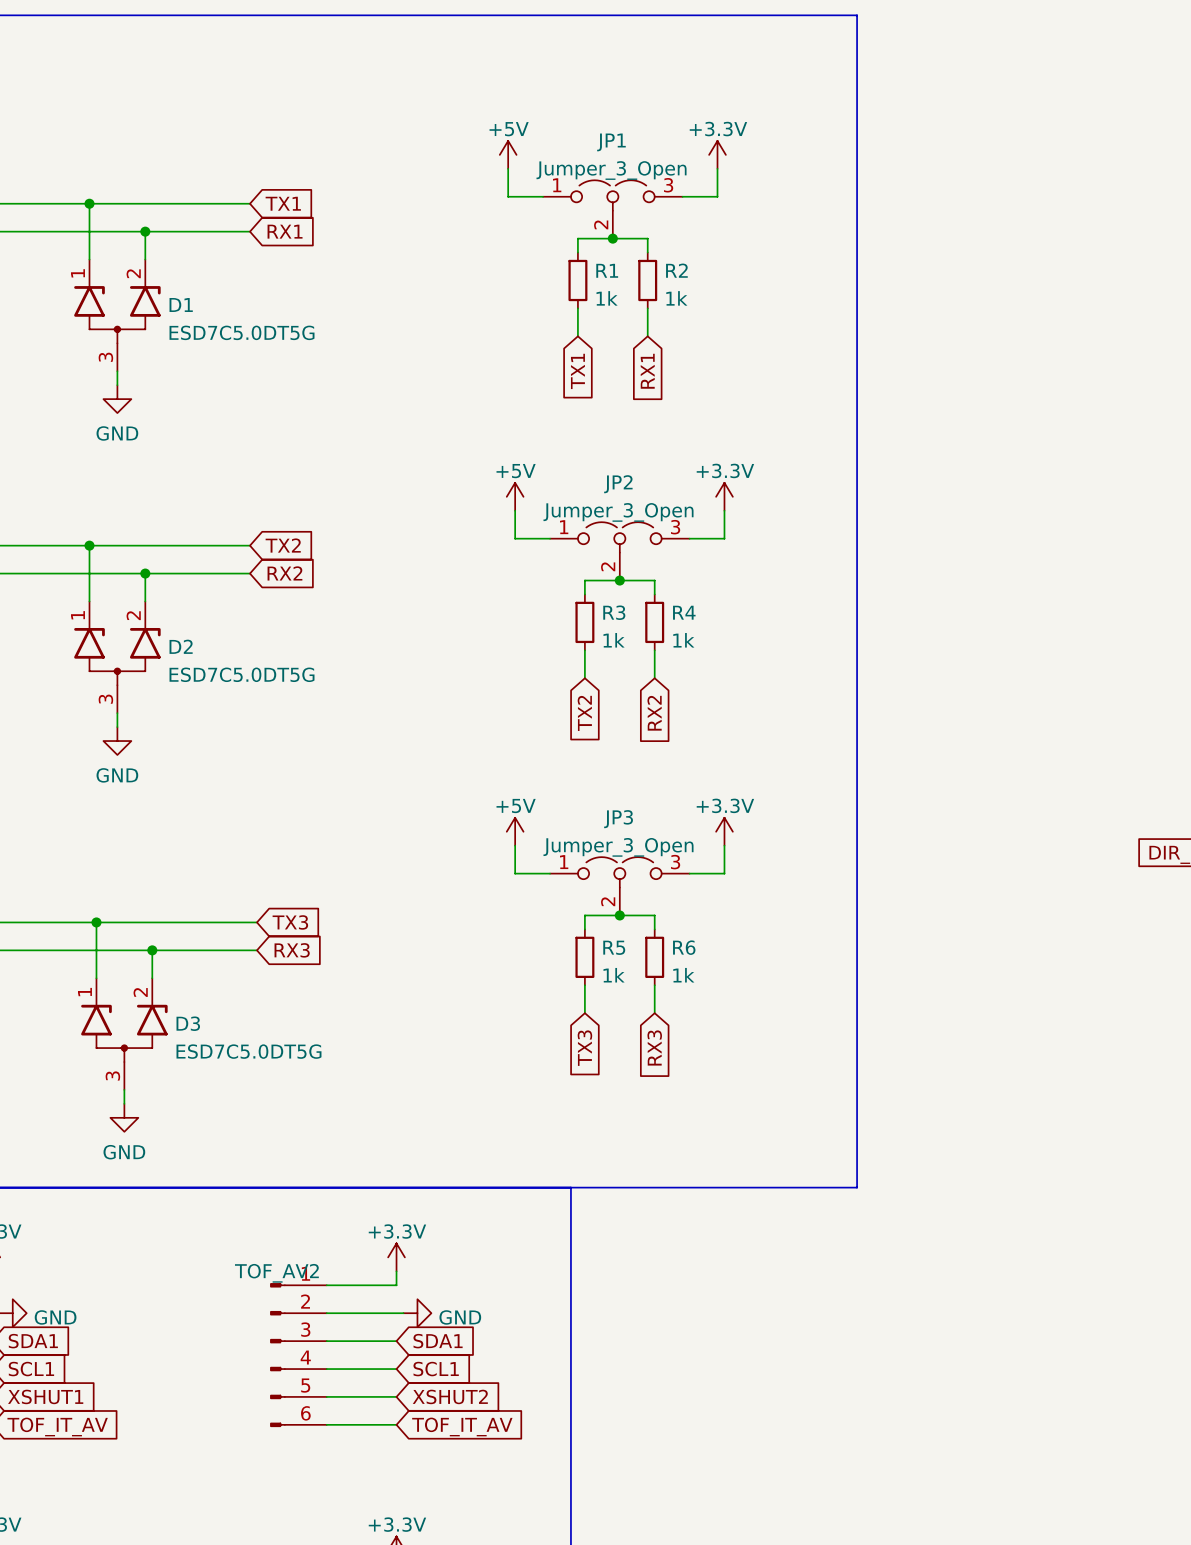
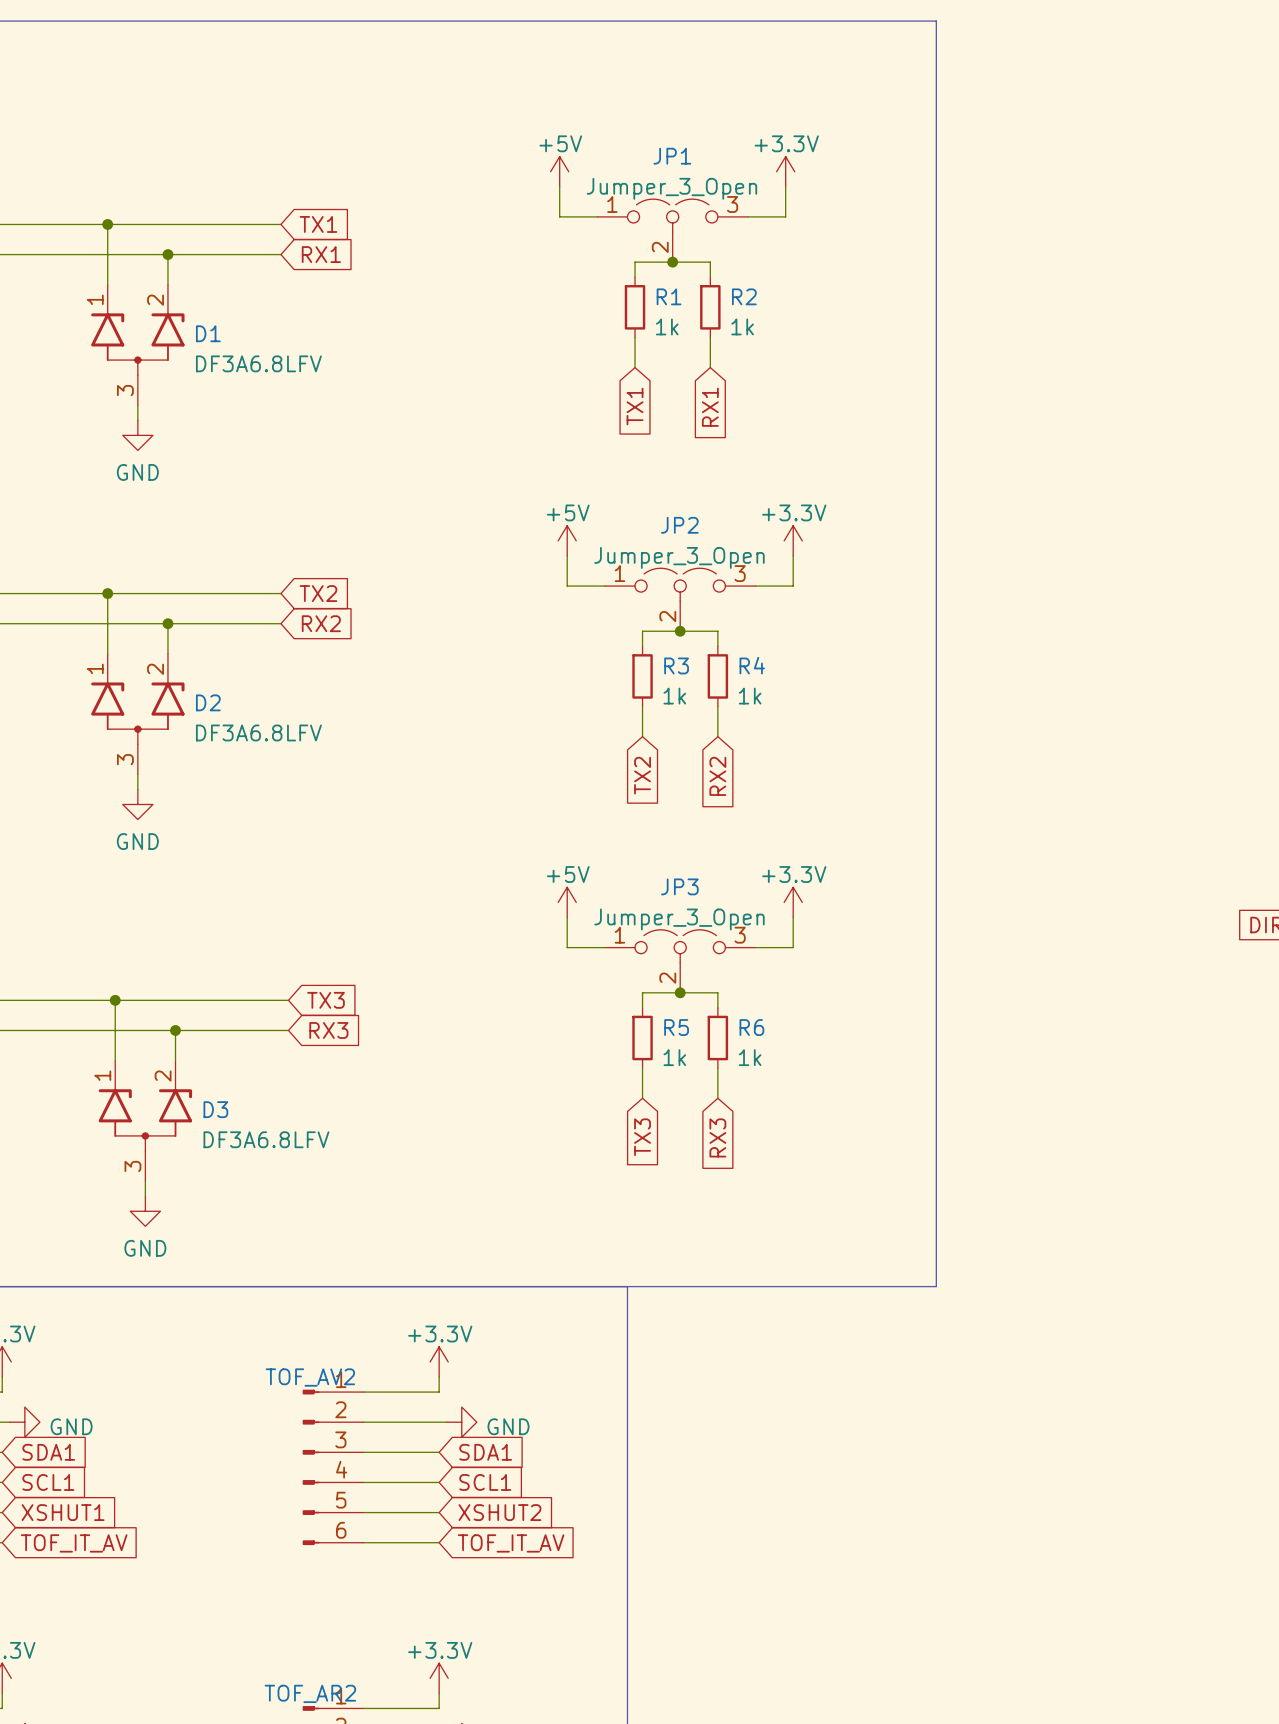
D1 value: ESD7C5.0DT5G (242, 332) -> DF3A6.8LFV (258, 363)
D2 value: ESD7C5.0DT5G (242, 674) -> DF3A6.8LFV (258, 732)
D3 value: ESD7C5.0DT5G (248, 1051) -> DF3A6.8LFV (266, 1139)

